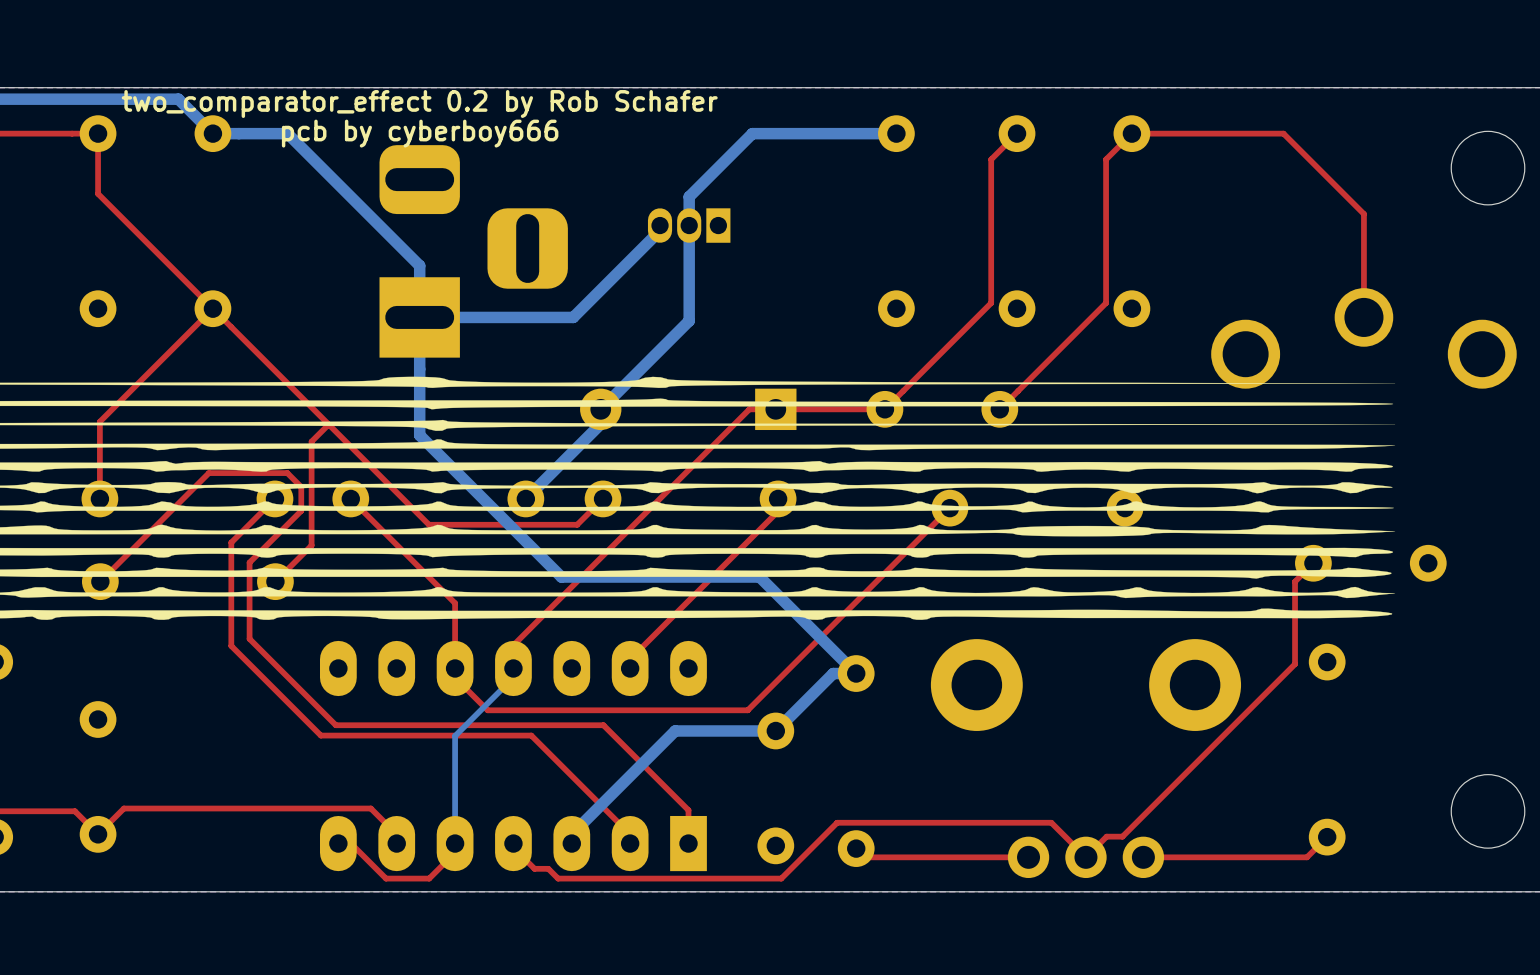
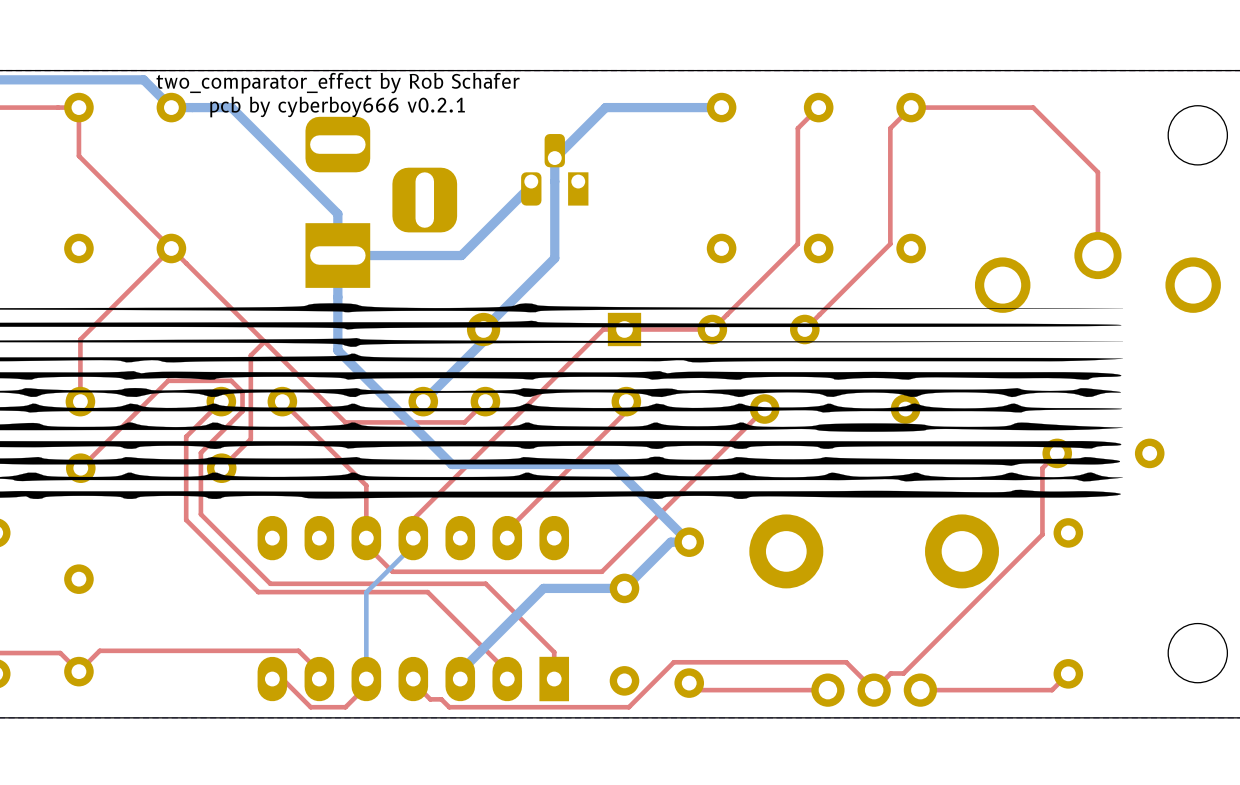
text: two_comparator_effect 0.2 by Rob Schafer (419, 103) -> two_comparator_effect by Rob Schafer (338, 83)
text: pcb by cyberboy666 (420, 133) -> pcb by cyberboy666 v0.2.1 (337, 107)
part footprint: [647, 208, 731, 243] -> [521, 134, 589, 206]

